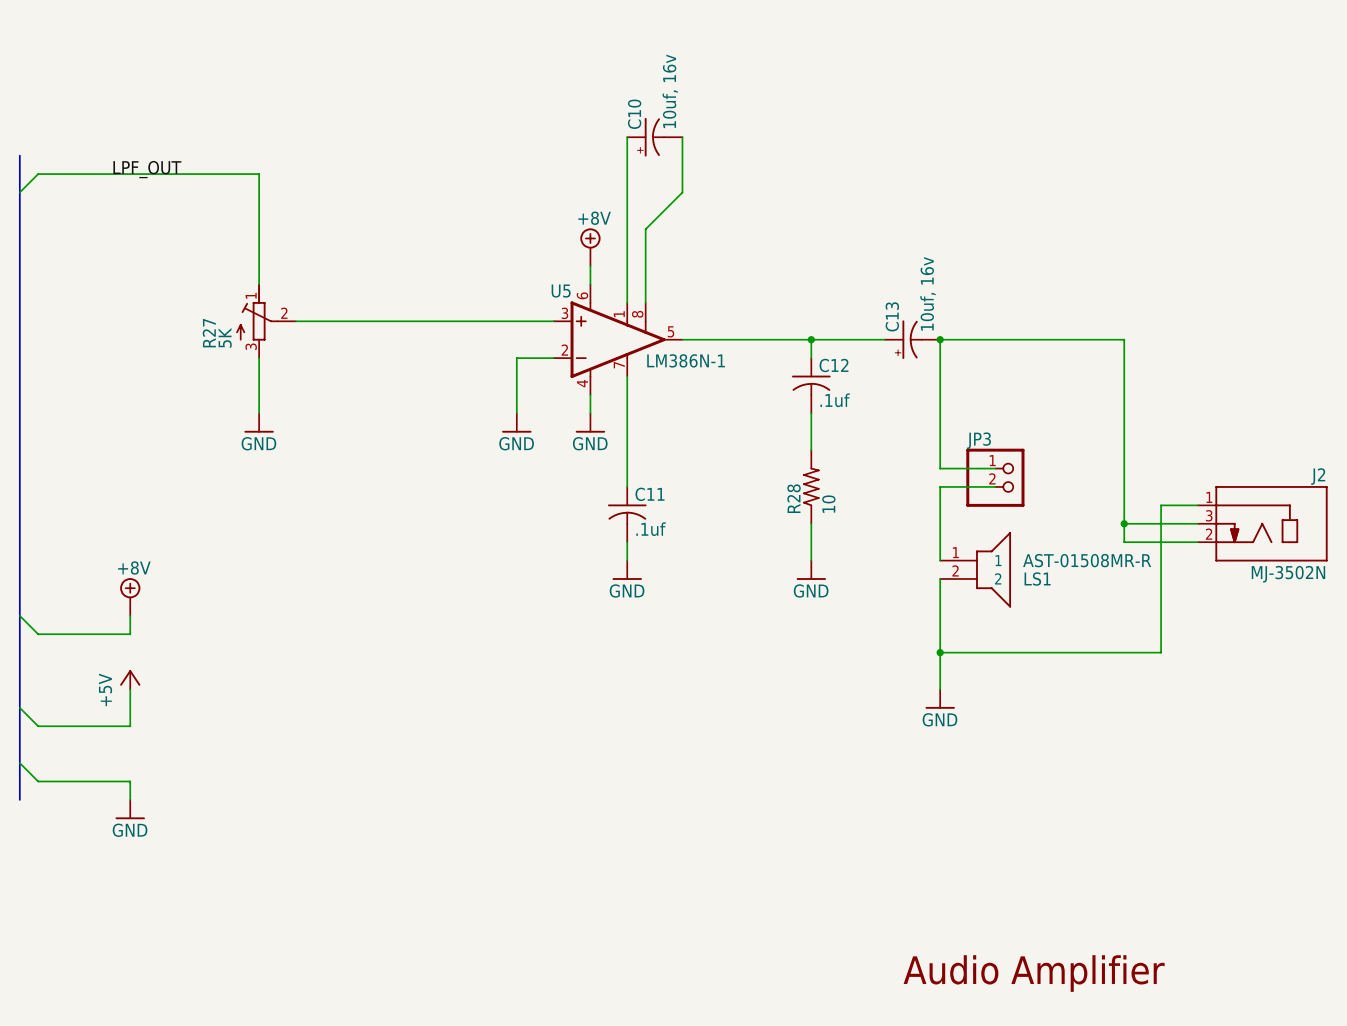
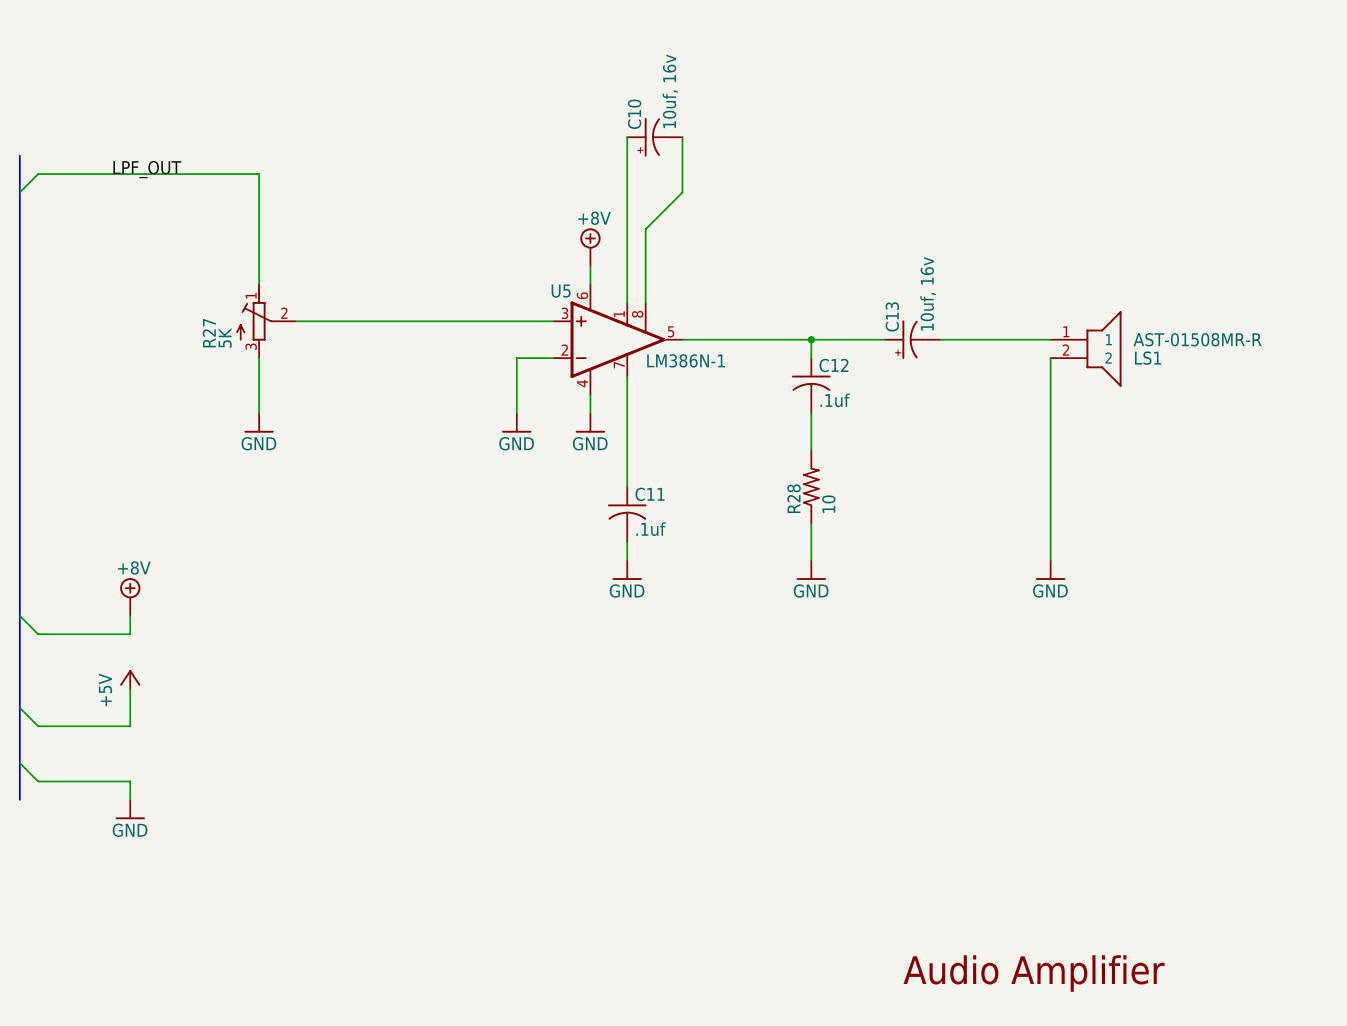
wire: (940, 339) (940, 468) (995, 468) -> none
junction: (940, 339) -> none
wire: (1050, 339) (1124, 339) (1124, 542) (1197, 542) -> none
wire: none -> (1050, 358) (1050, 560)
JP3: (995, 477) -> none
wire: (995, 486) (940, 486) (940, 560) -> none
wire: (1197, 505) (1161, 505) (1161, 652) (940, 652) -> none
wire: (1124, 523) (1197, 523) -> none
junction: (1124, 523) -> none
J2: MJ-3502N (1262, 523) -> none
LS1 position: (975, 569) -> (1086, 348)
wire: (940, 579) (940, 689) -> none
junction: (940, 652) -> none
power symbol position: GND (940, 699) -> GND (1050, 570)

